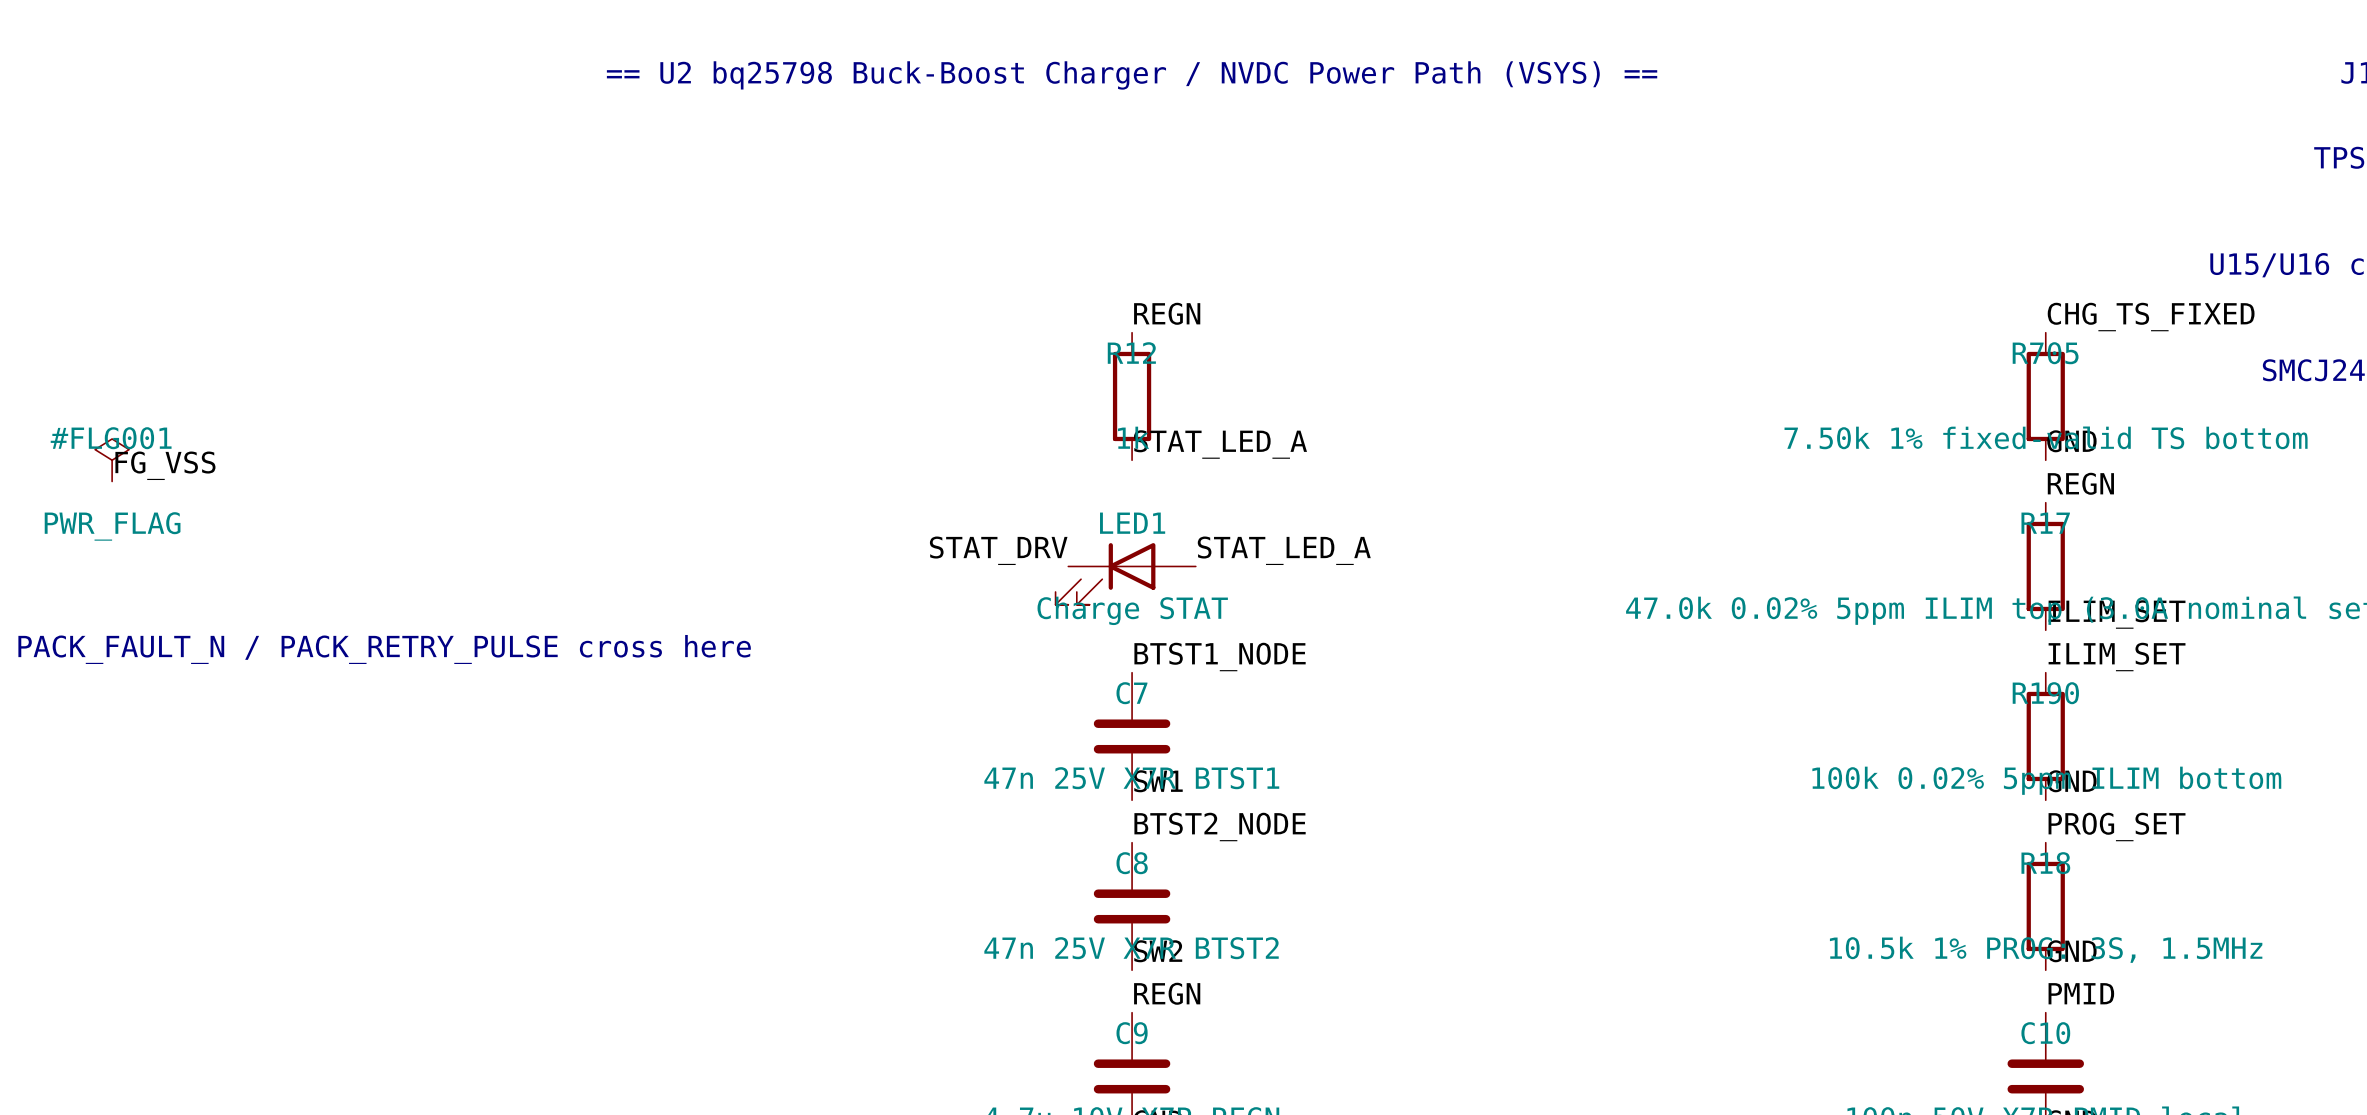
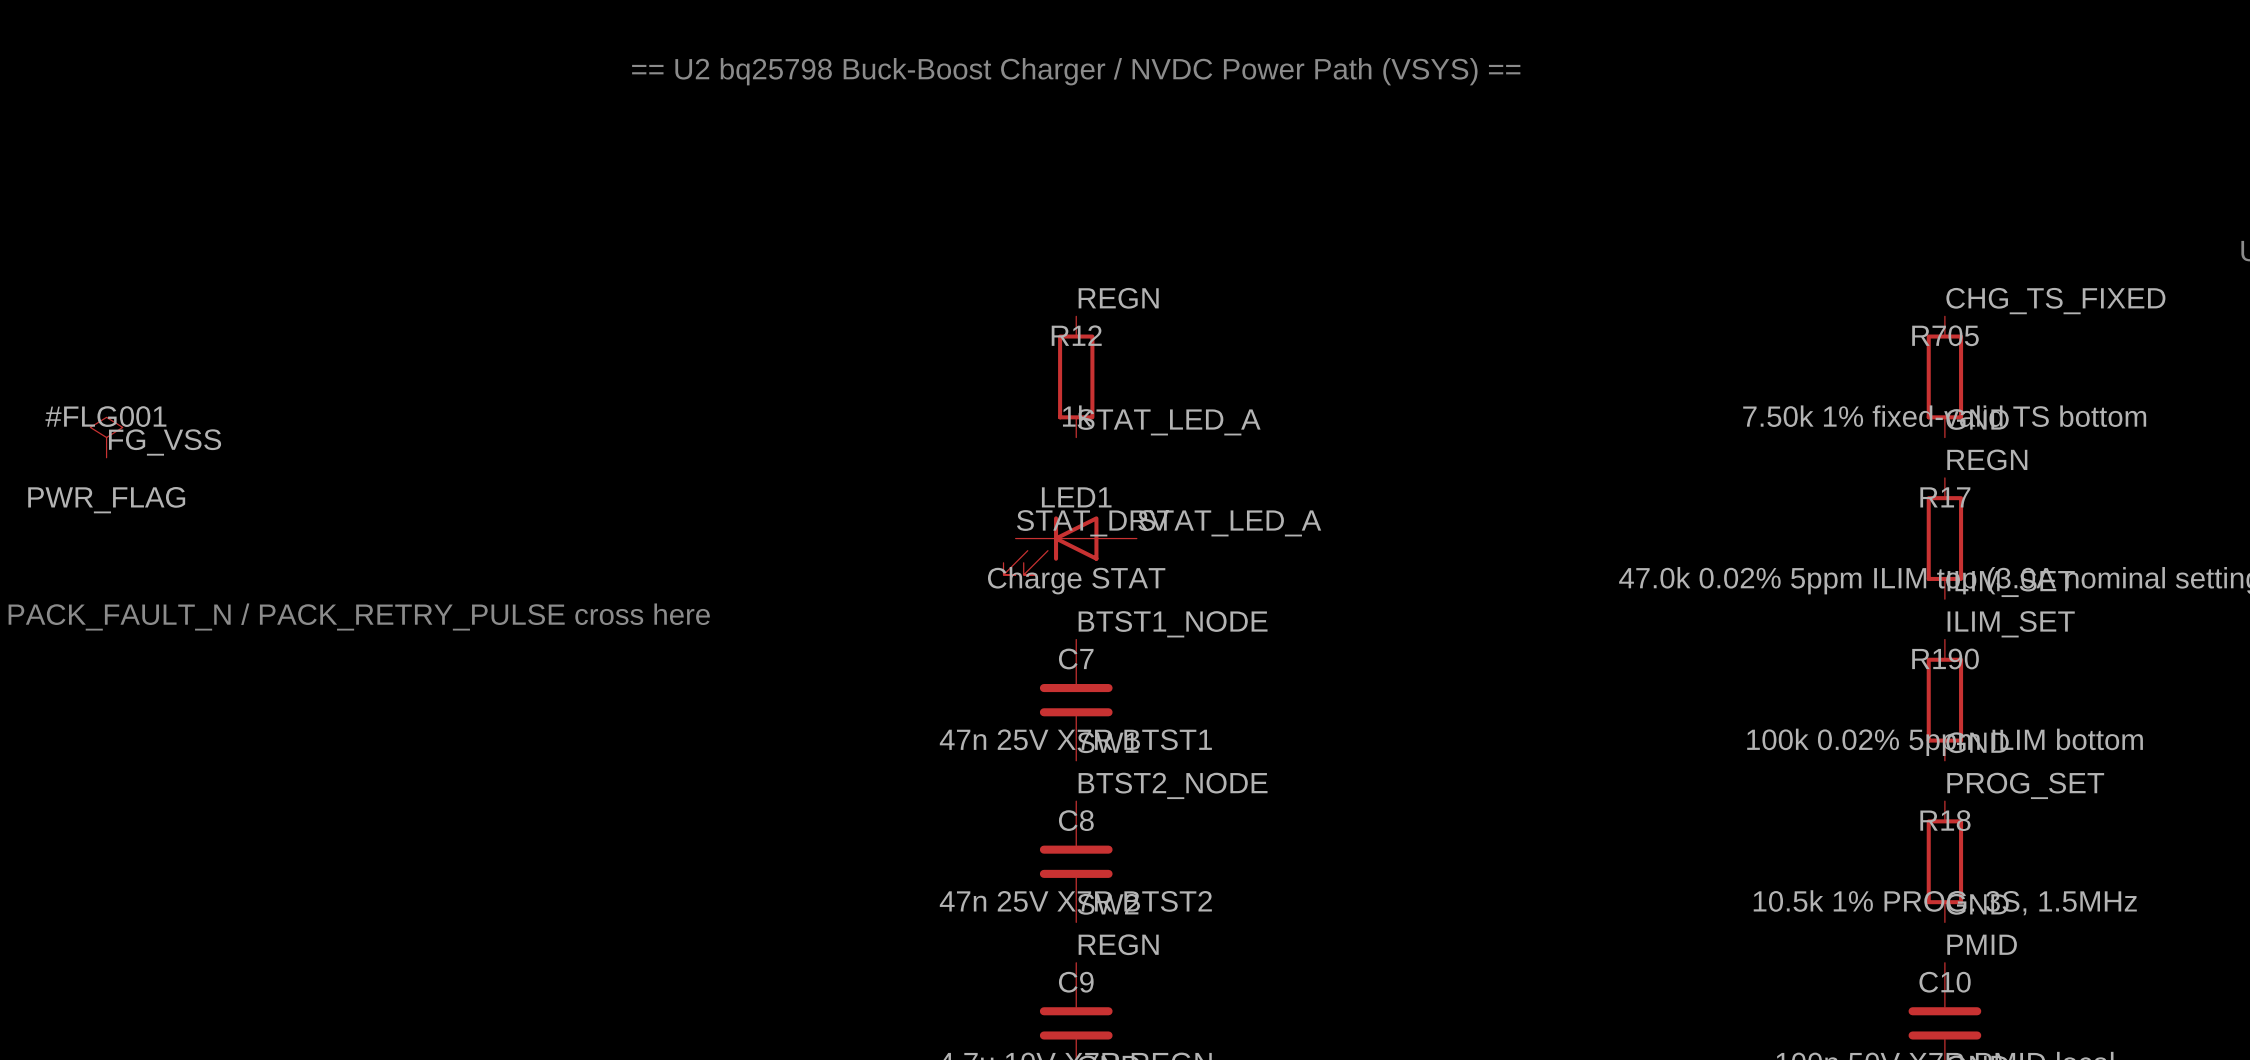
label position: STAT_DRV (998, 550) -> STAT_DRV (1092, 523)

